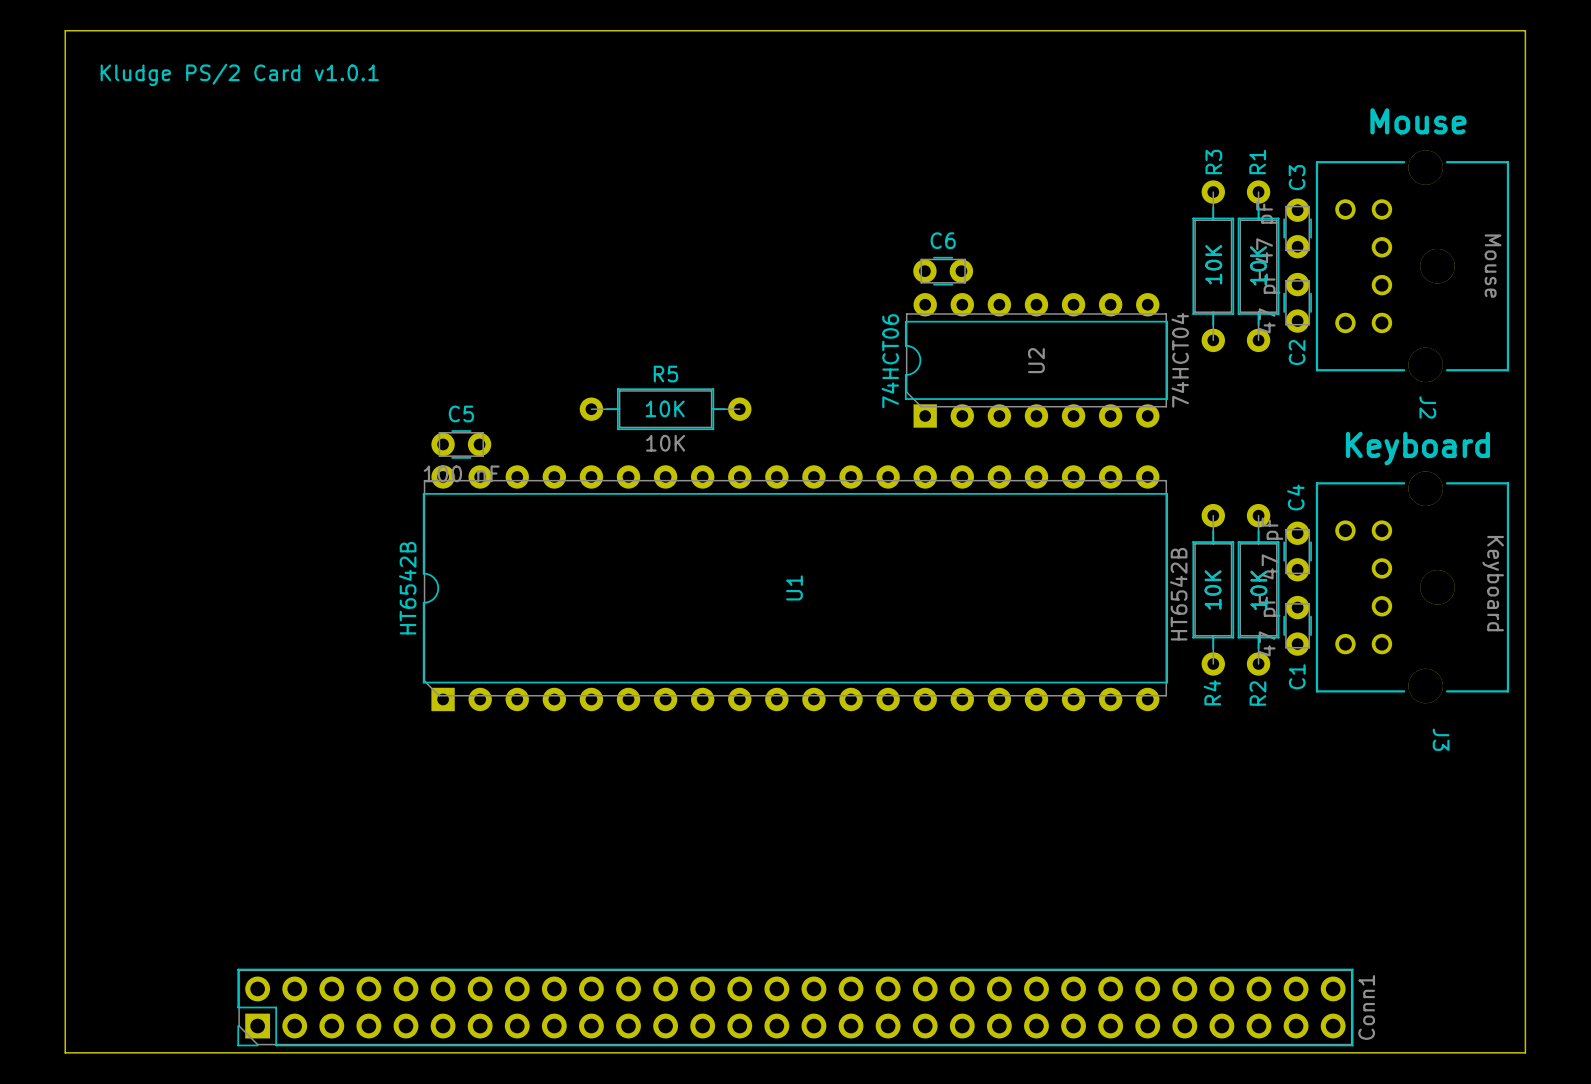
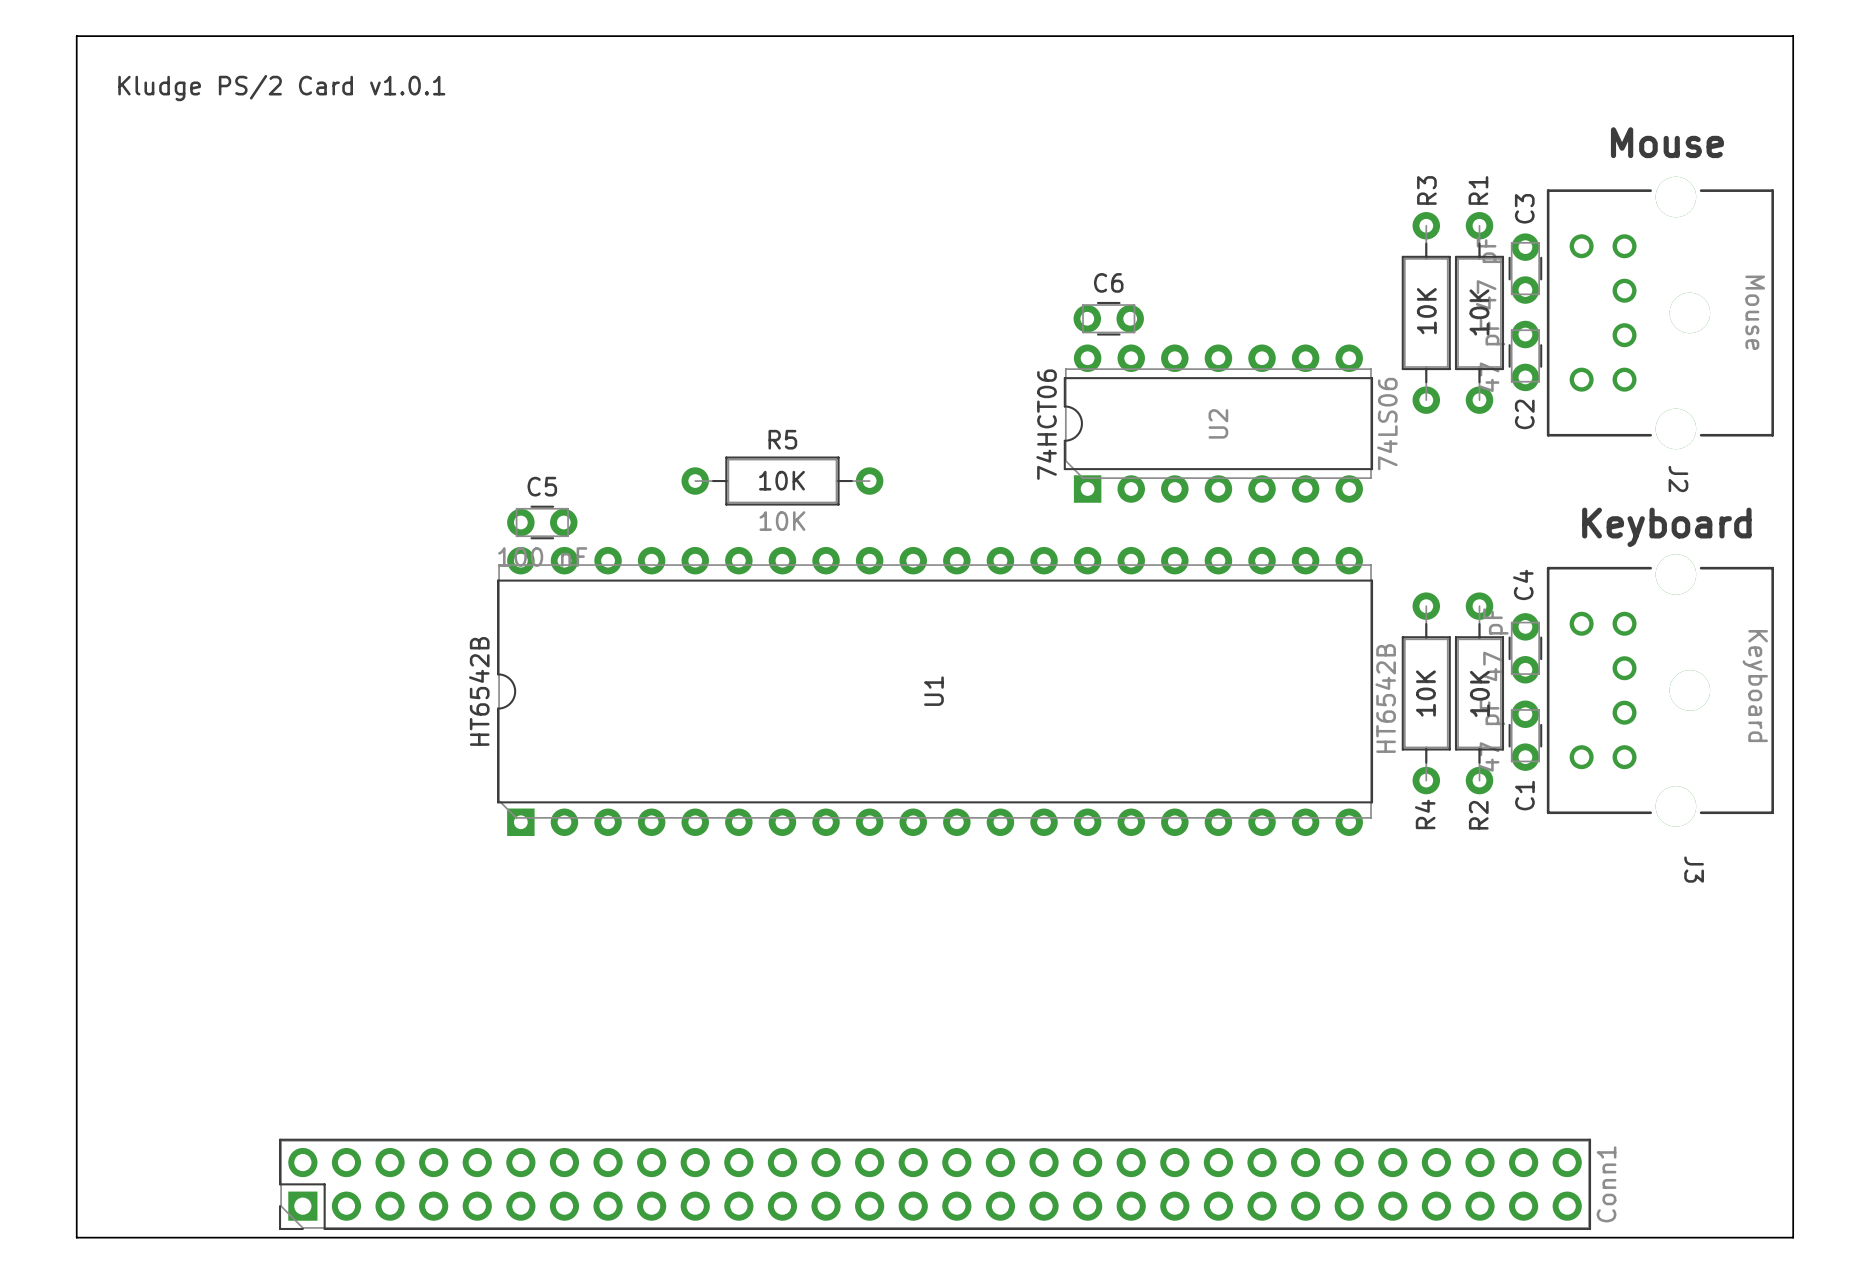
U2 value: 74HCT04 (1180, 360) -> 74LS06 (1387, 424)

